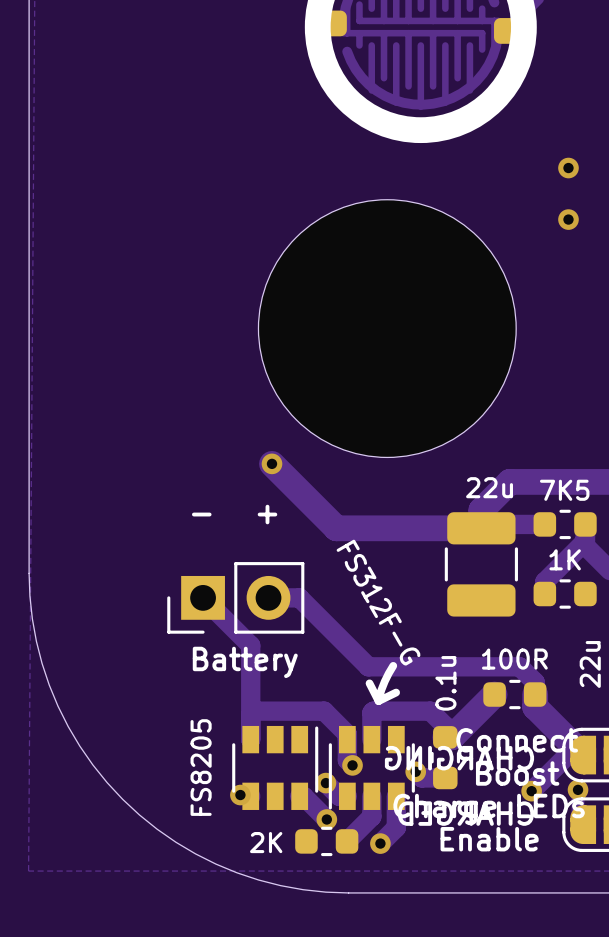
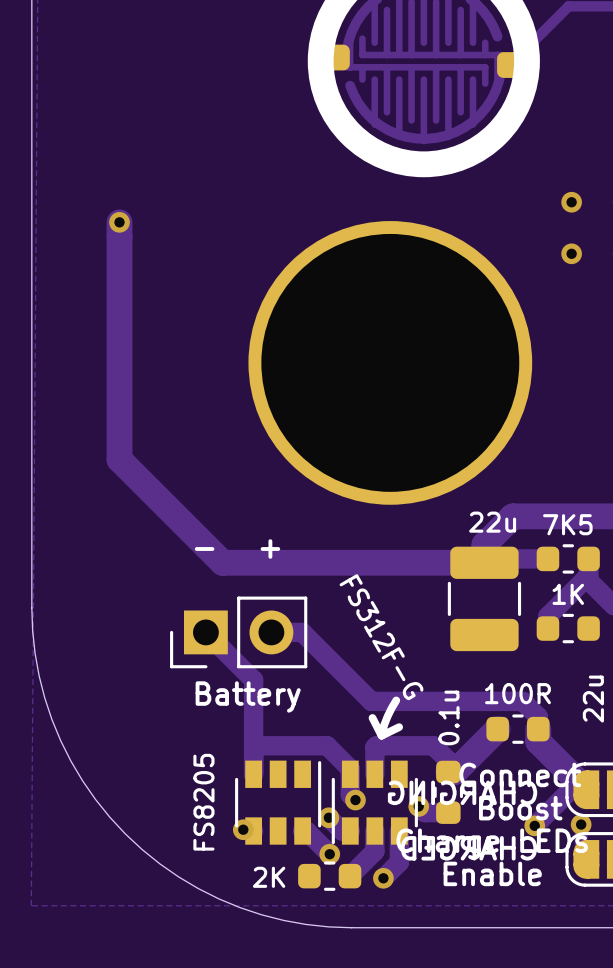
via: none -> (119, 222)
part footprint: [258, 199, 517, 458] -> [248, 221, 533, 505]
track: (271, 463) (336, 528) -> (119, 222) (119, 459) (222, 562) (339, 562)
via: (271, 463) -> none

